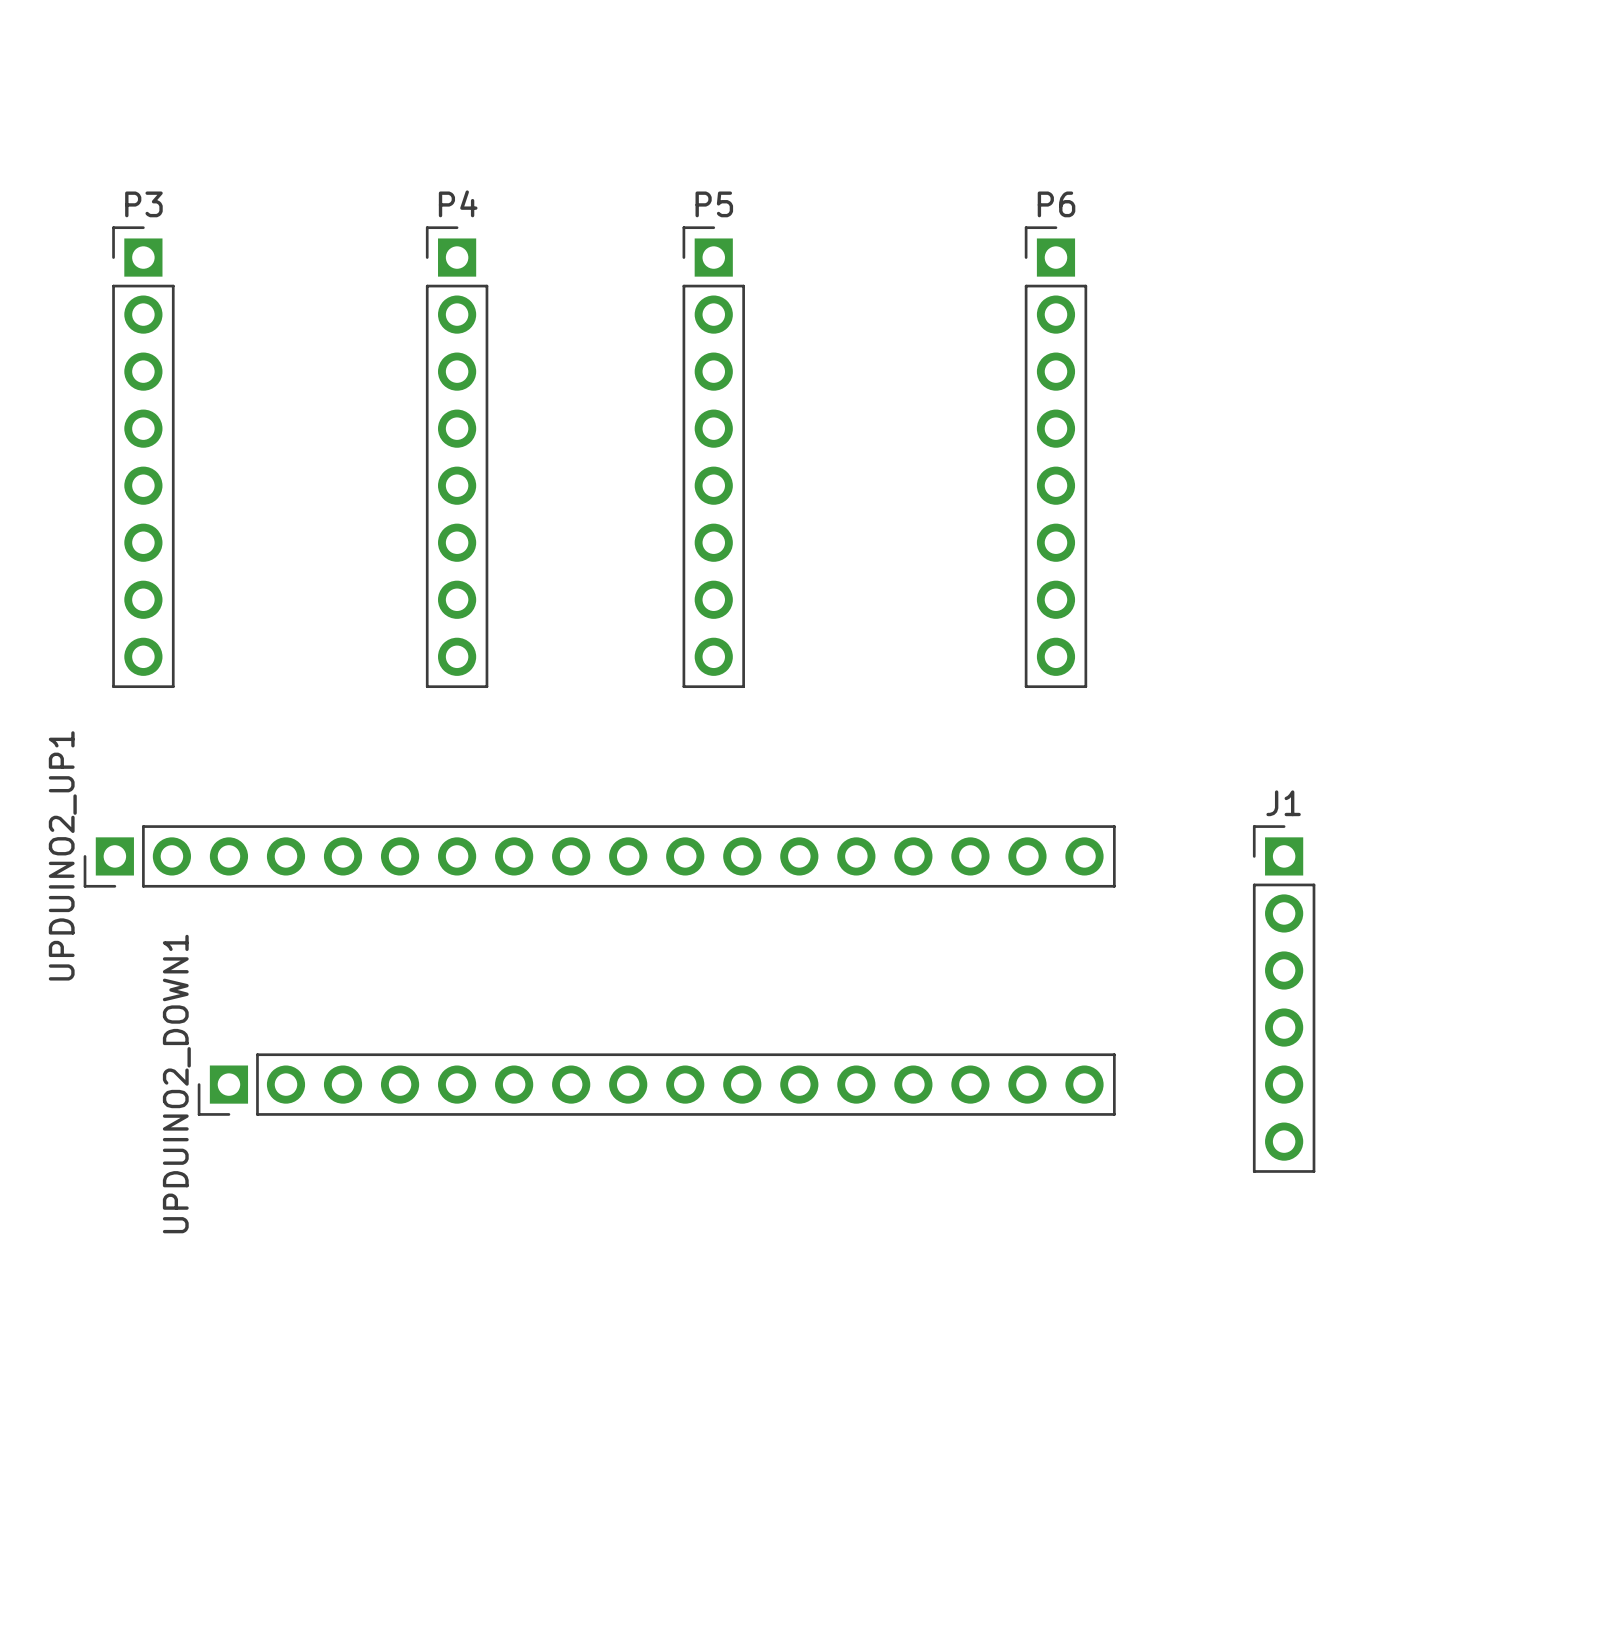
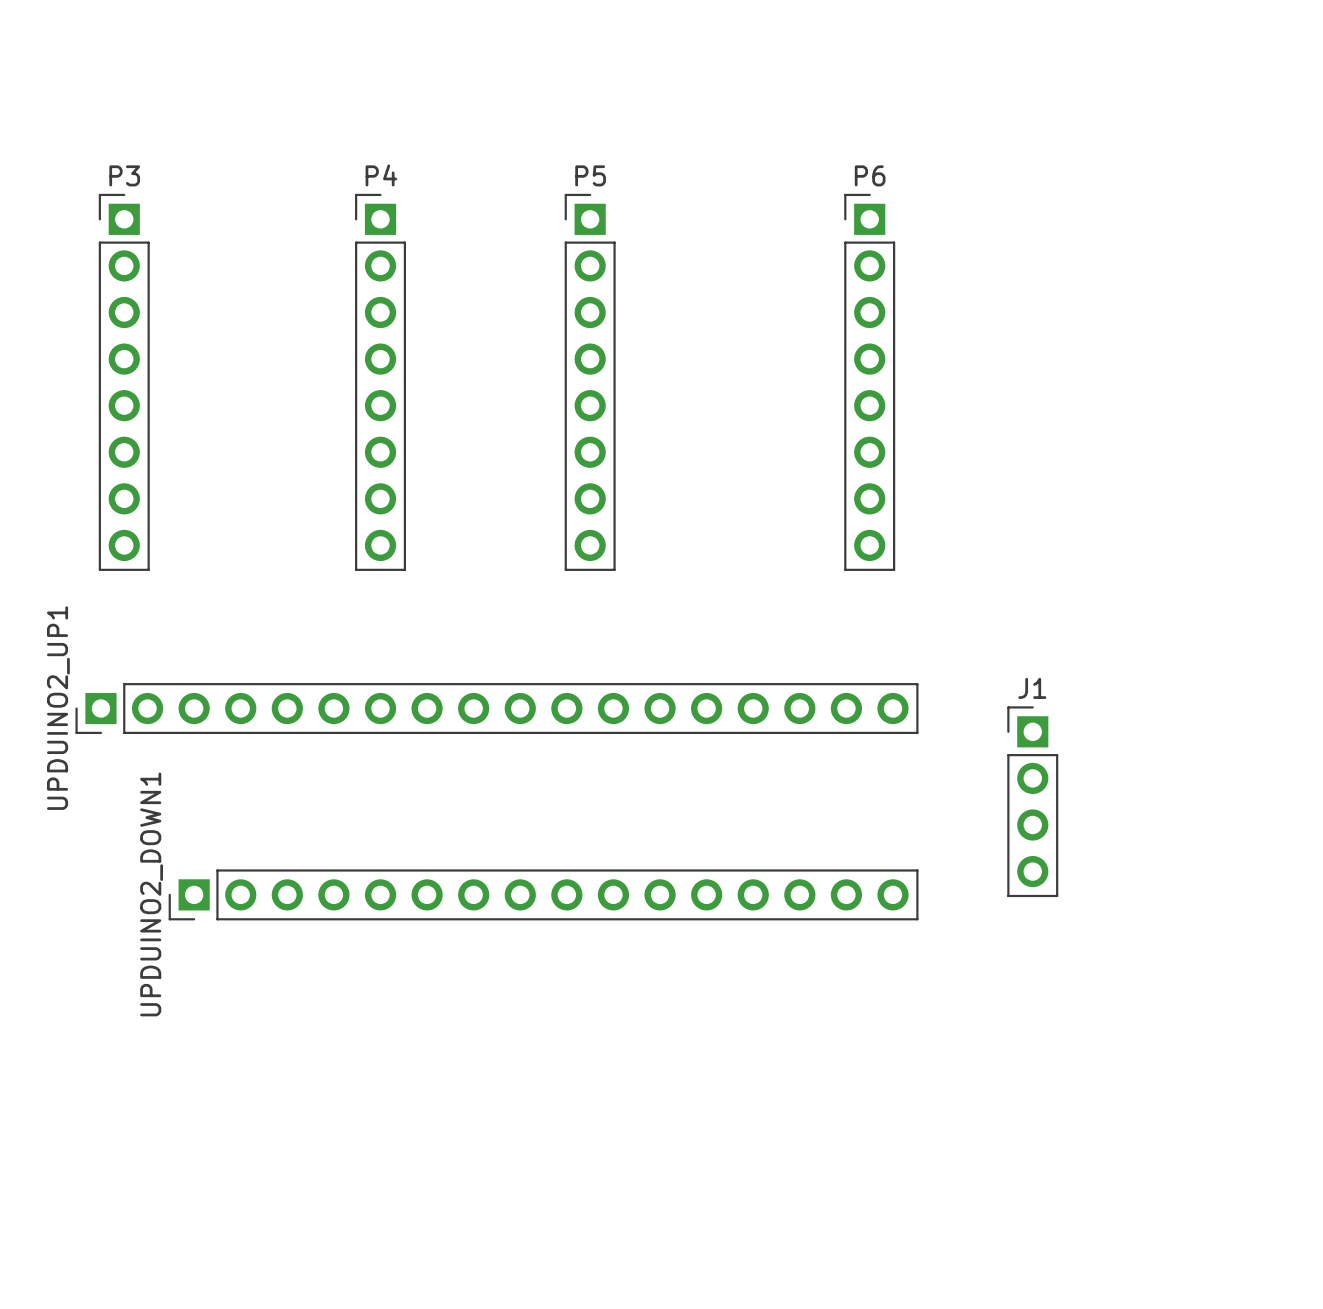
J1 name position: J1 (1283, 803) -> J1 (1032, 688)
J1 footprint: [1252, 825, 1316, 1173] -> [1007, 706, 1059, 898]

